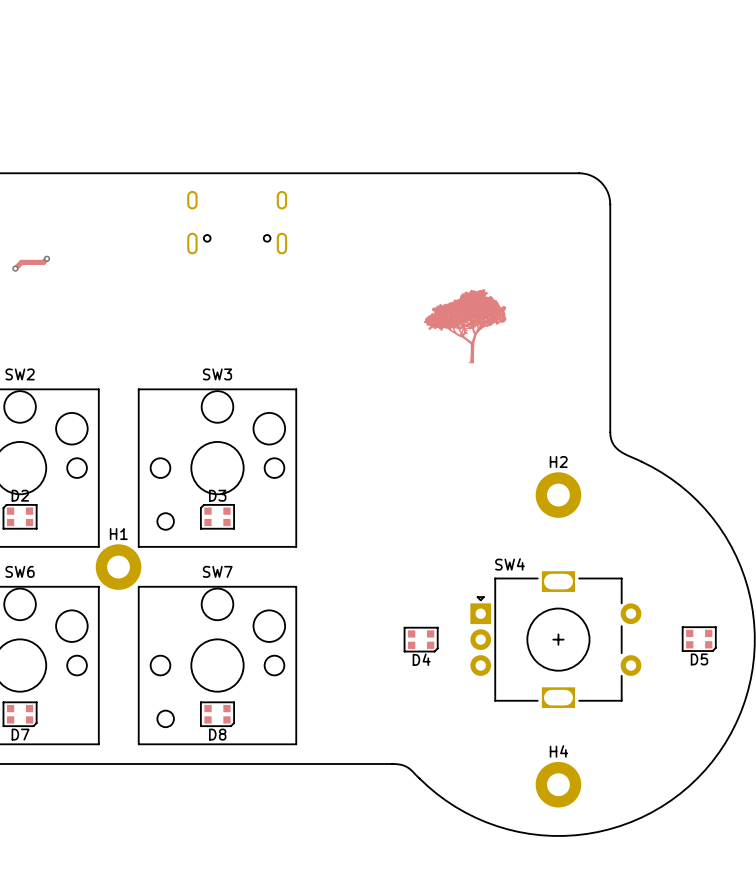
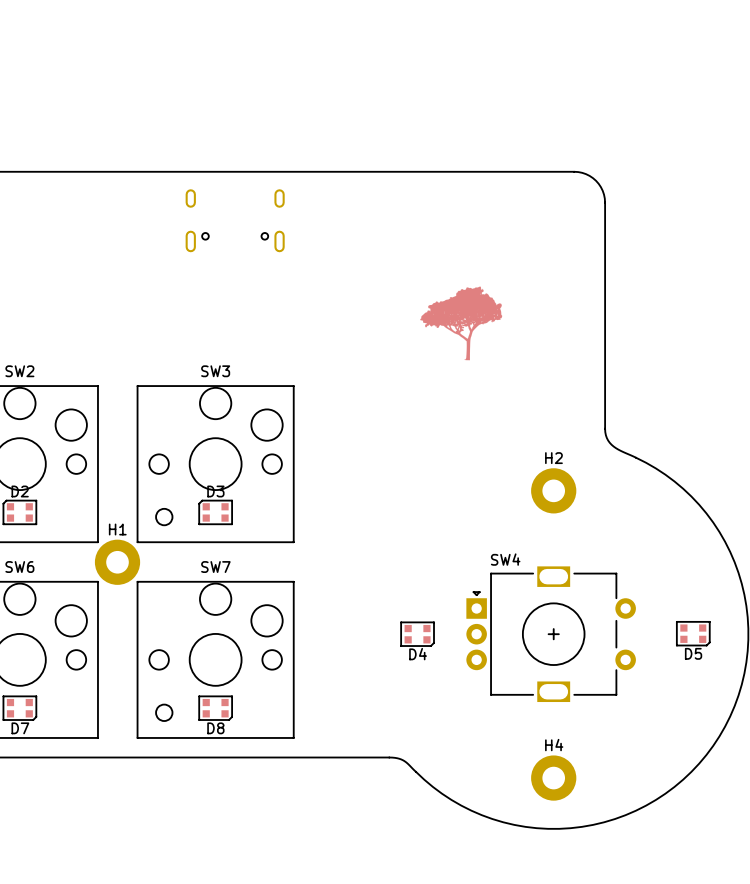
track: (47, 258) (43, 262) (21, 262) (15, 268) -> none
via: (47, 258) -> none
via: (15, 268) -> none

